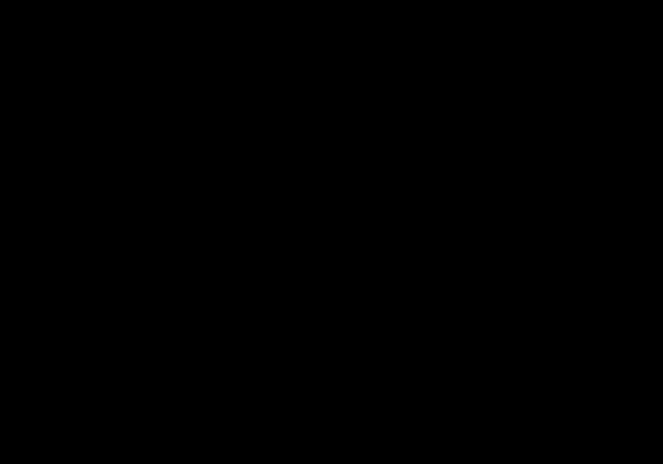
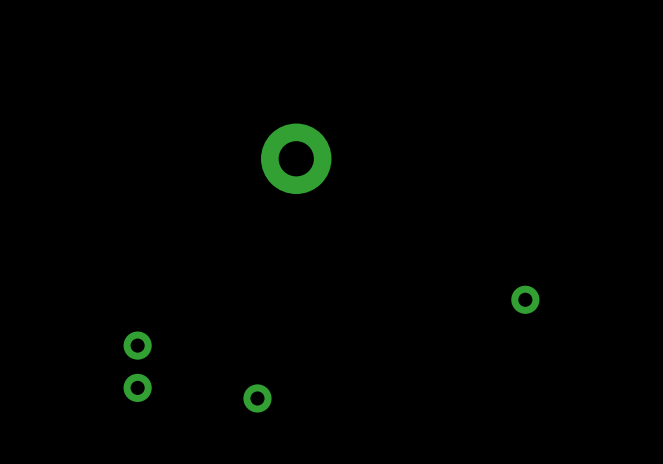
part: none -> (296, 158)
via: none -> (525, 299)
via: none -> (137, 345)
via: none -> (137, 387)
via: none -> (257, 398)

